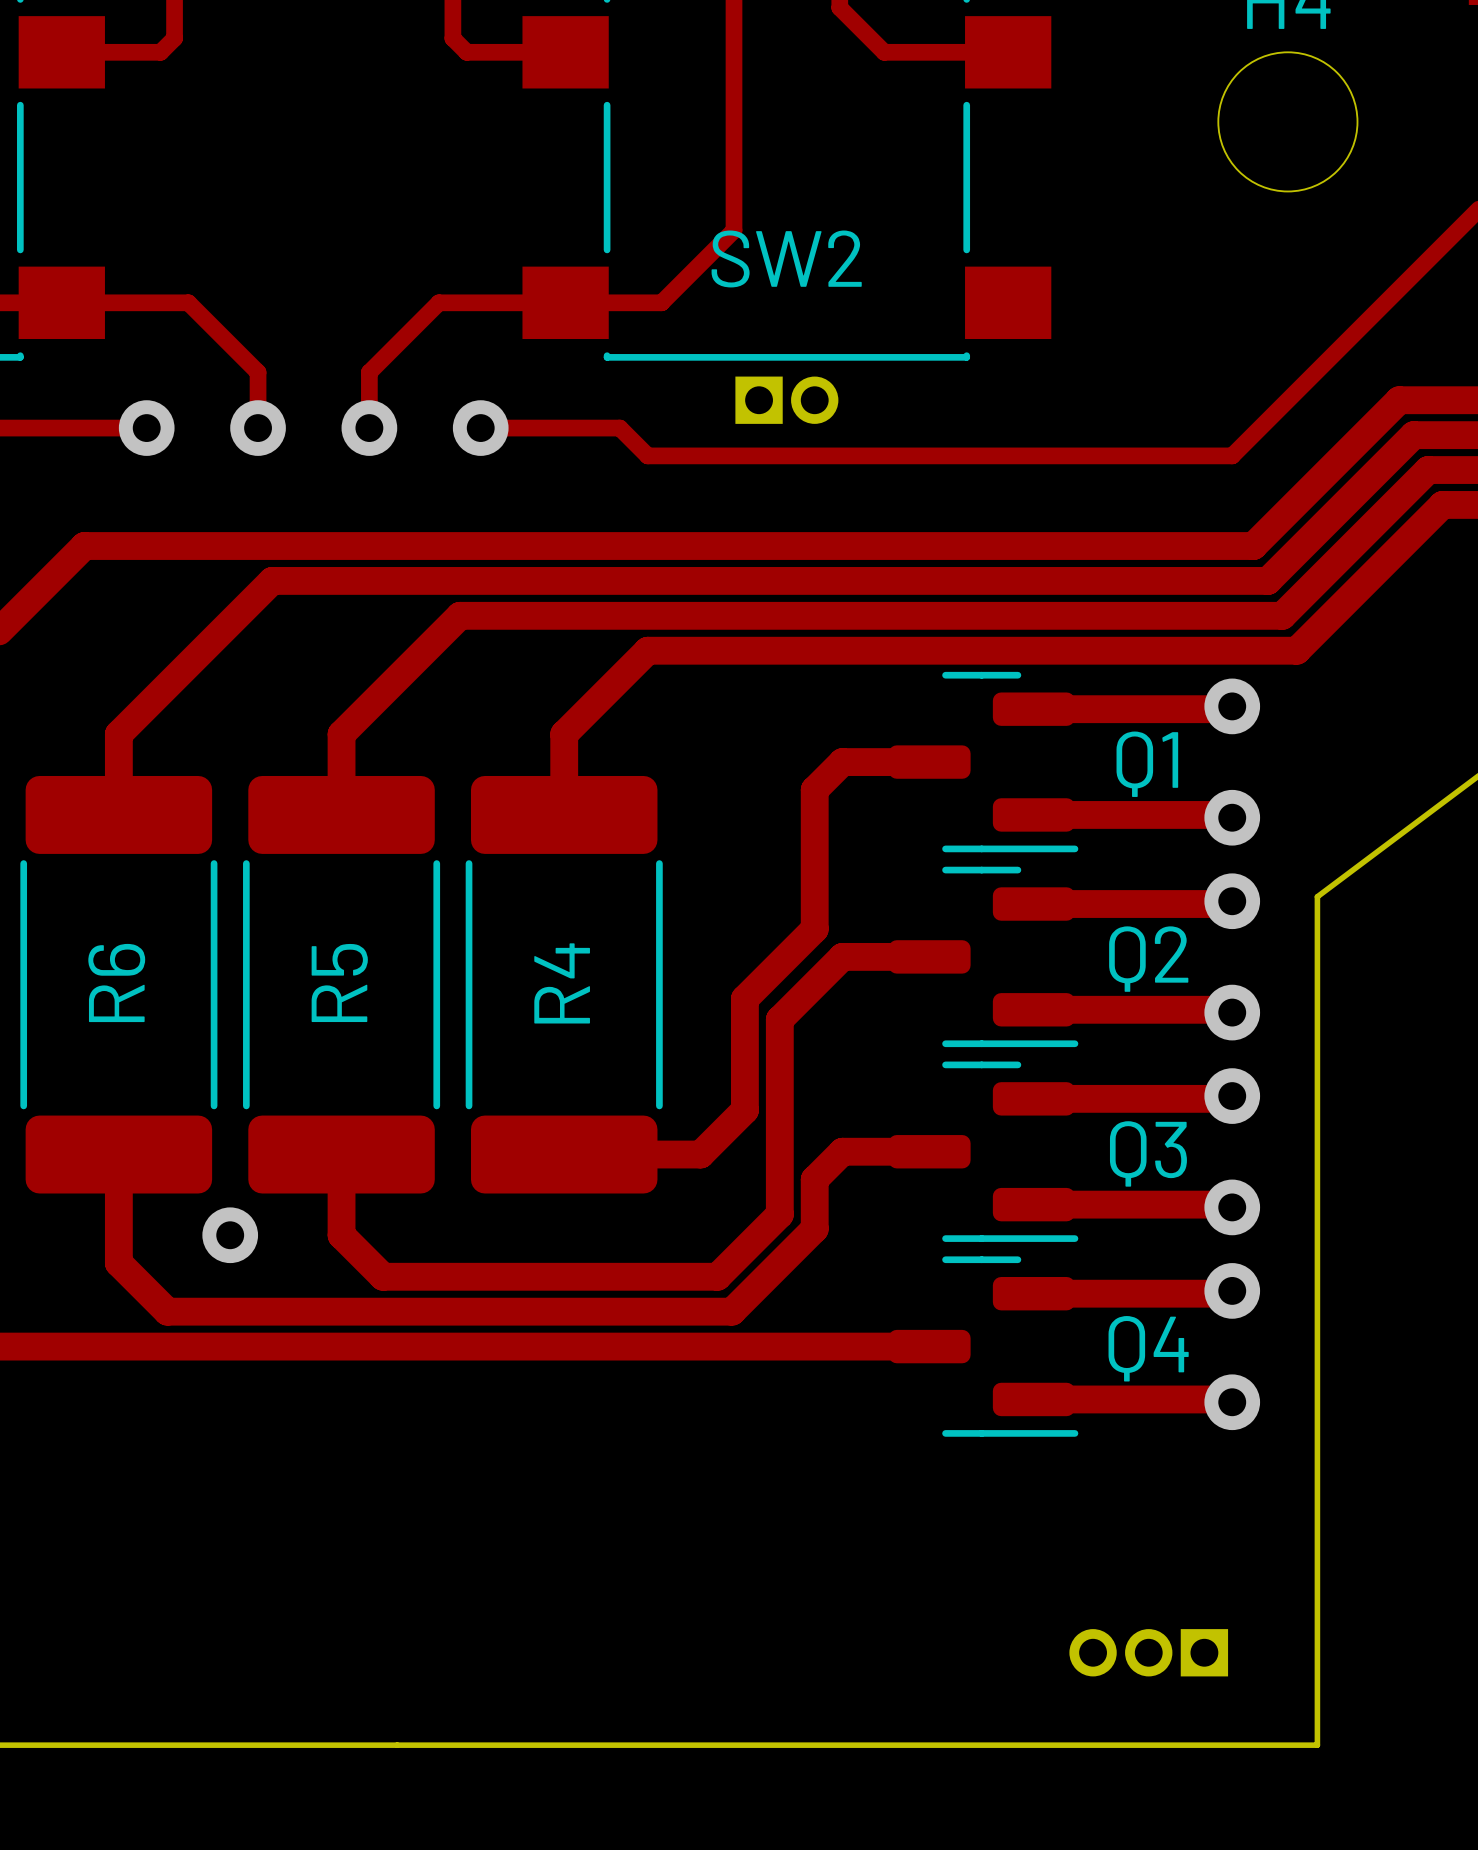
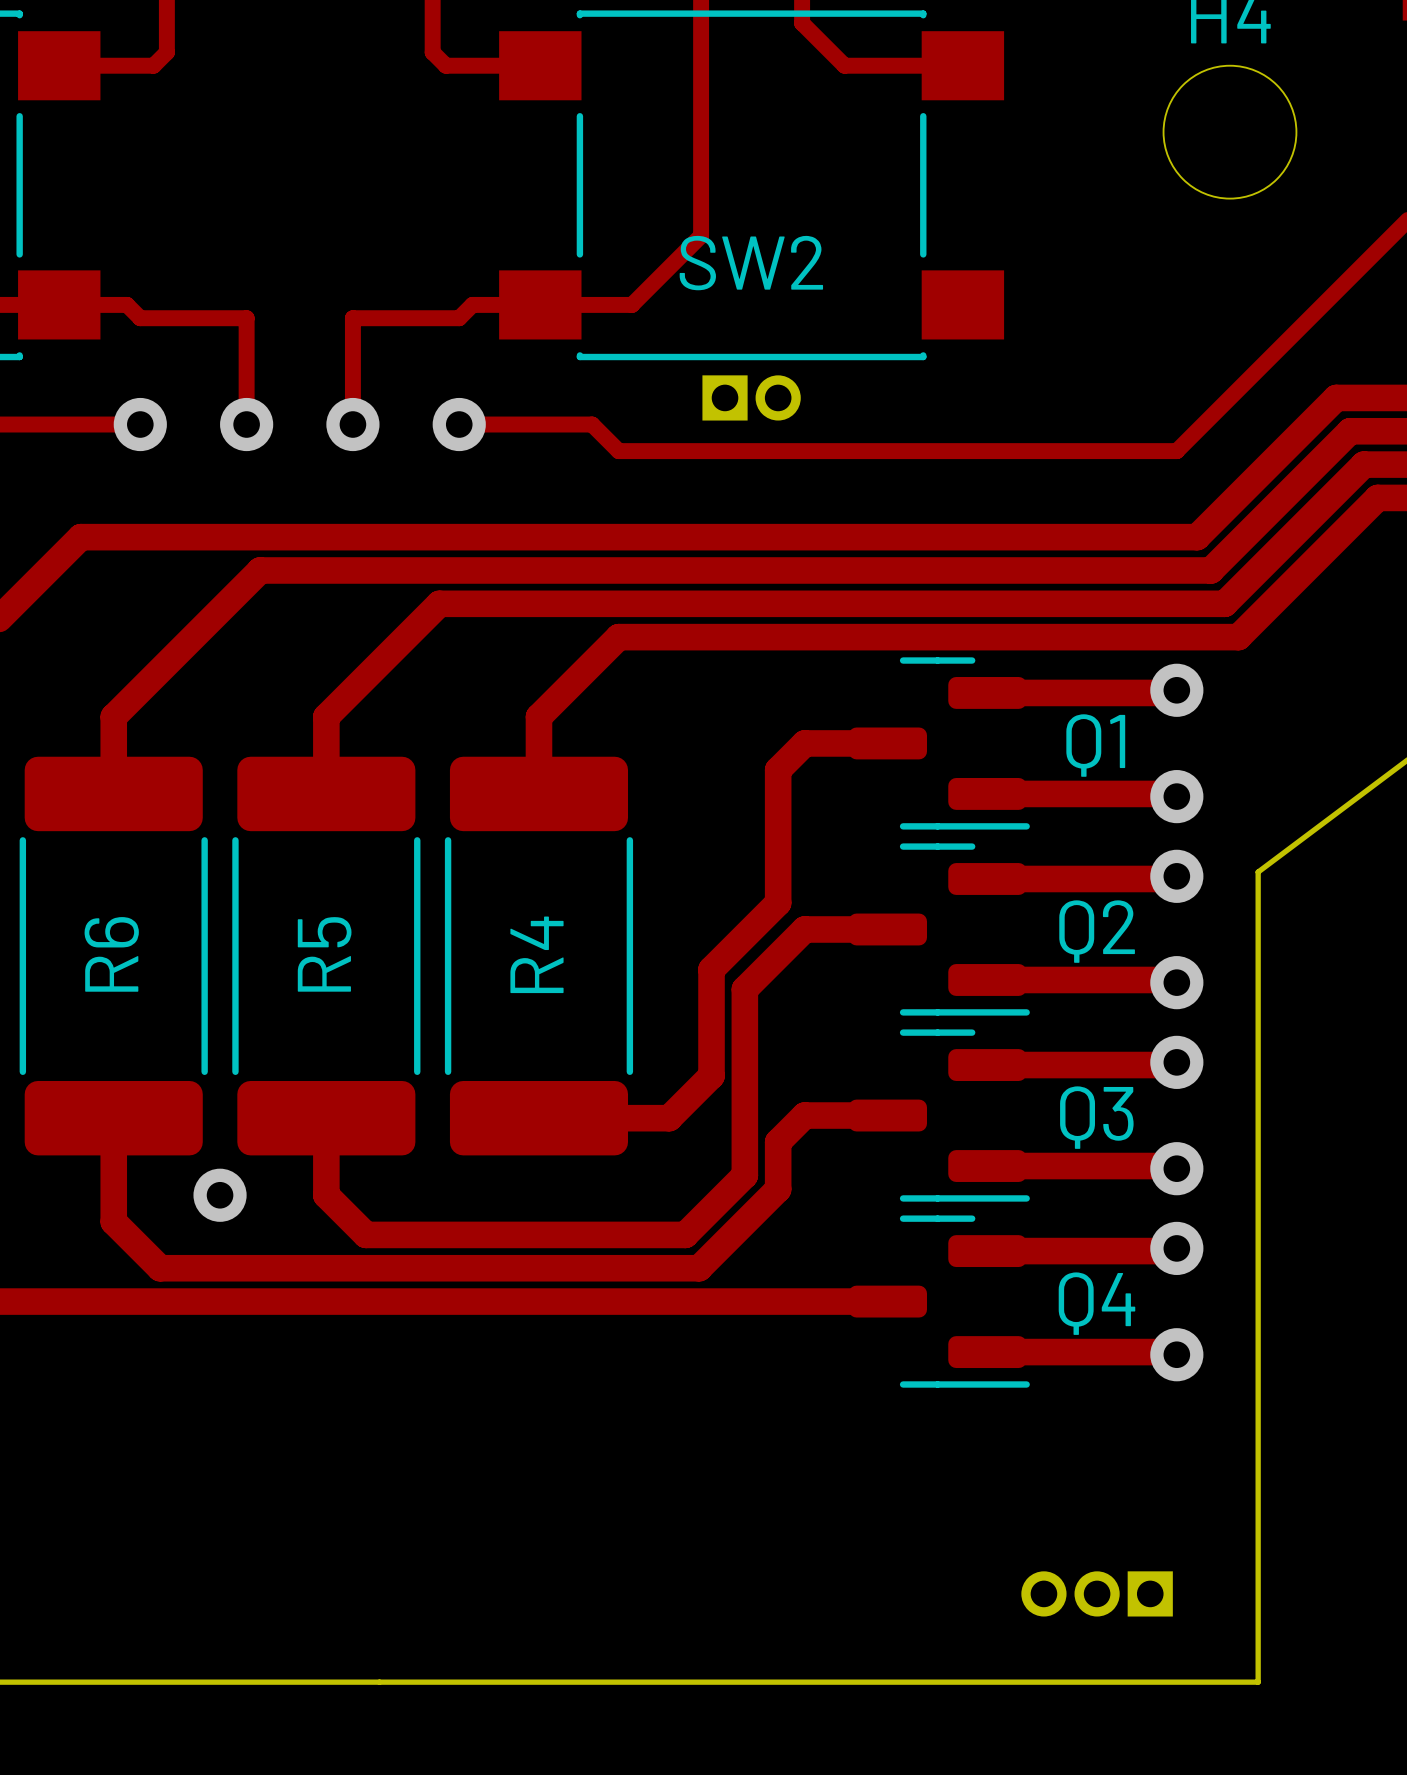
track: (132, 302) (188, 302) (258, 372) -> (127, 304) (140, 318) (246, 318) (246, 371)
track: (494, 302) (438, 302) (369, 372) -> (472, 304) (459, 318) (352, 318) (352, 371)

